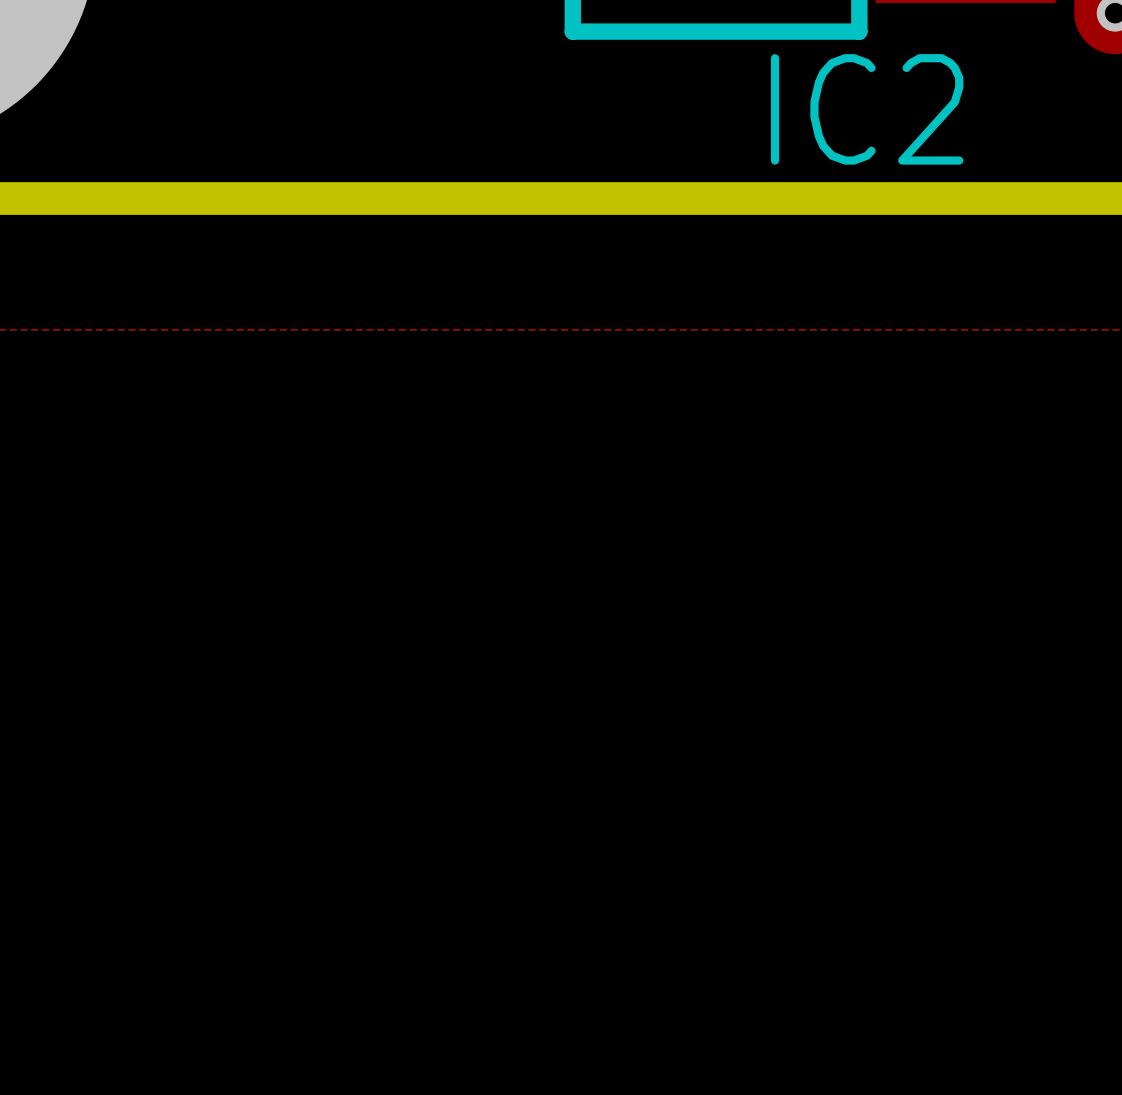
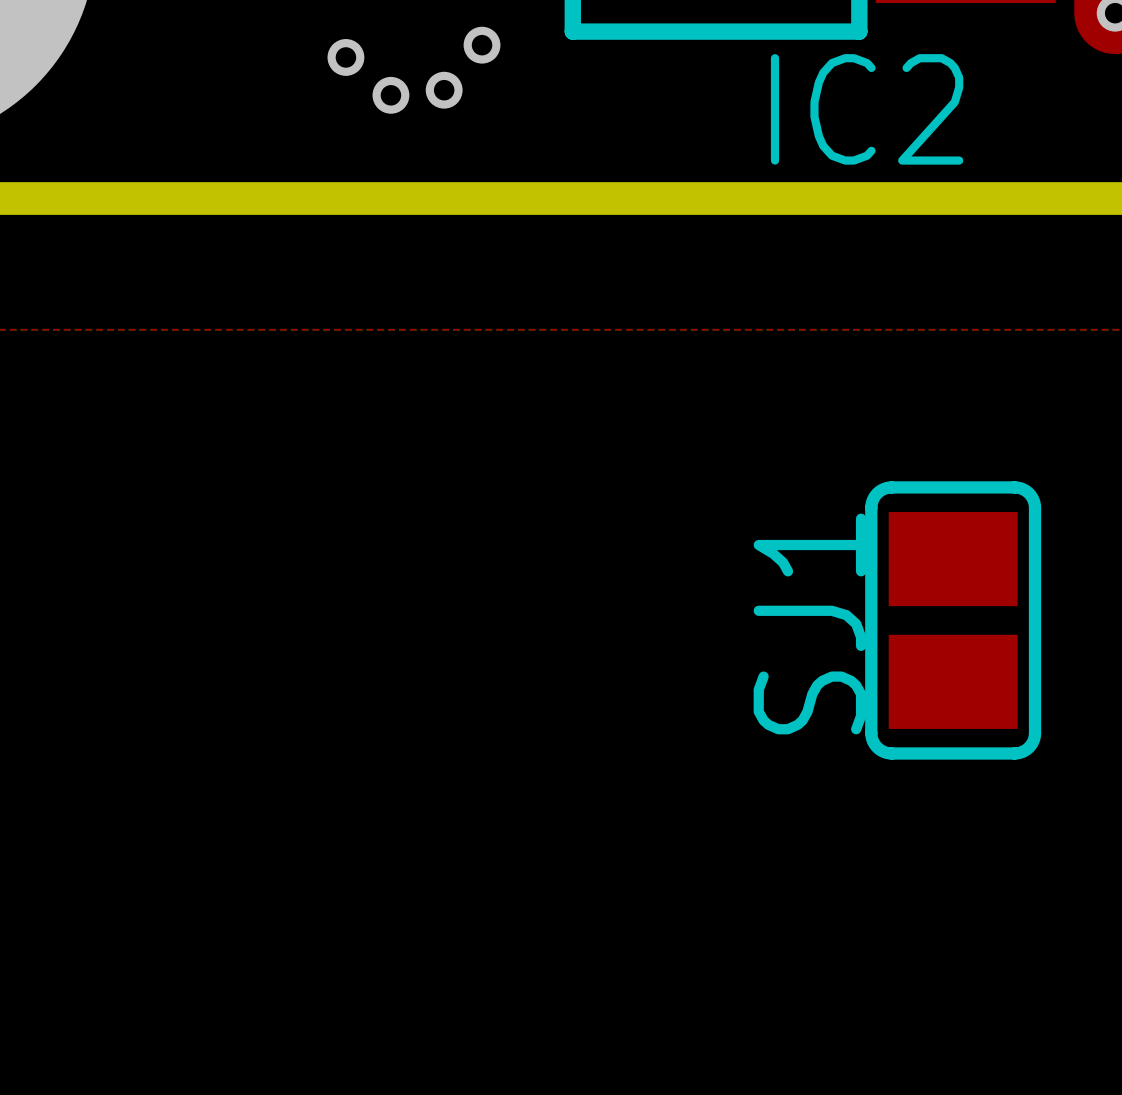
via: none -> (482, 45)
via: none -> (345, 57)
via: none -> (444, 90)
via: none -> (390, 95)
SJ1: none -> (953, 620)

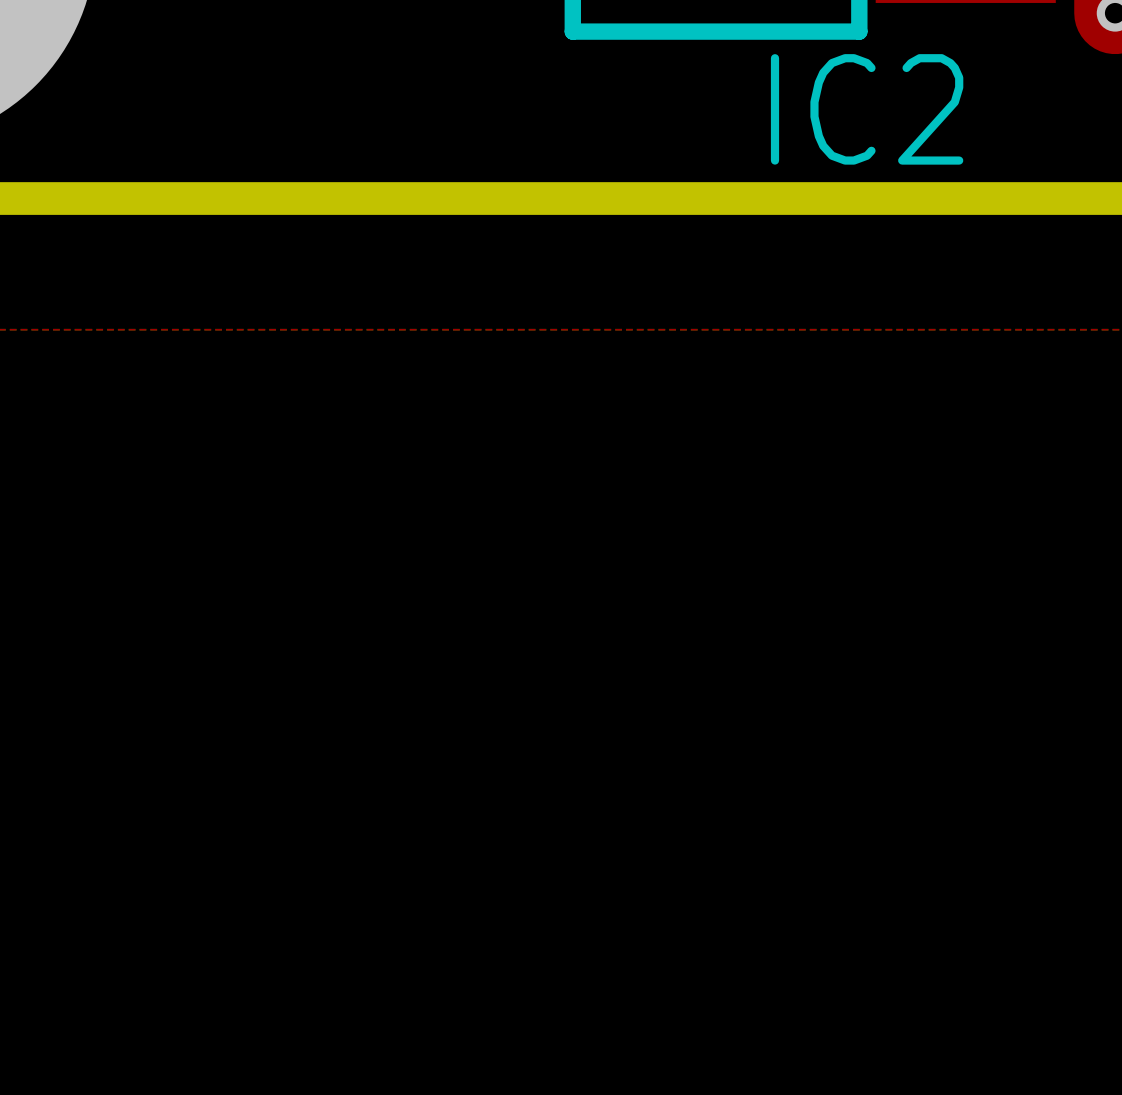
via: (482, 45) -> none
via: (345, 57) -> none
via: (444, 90) -> none
via: (390, 95) -> none
SJ1: (953, 620) -> none

